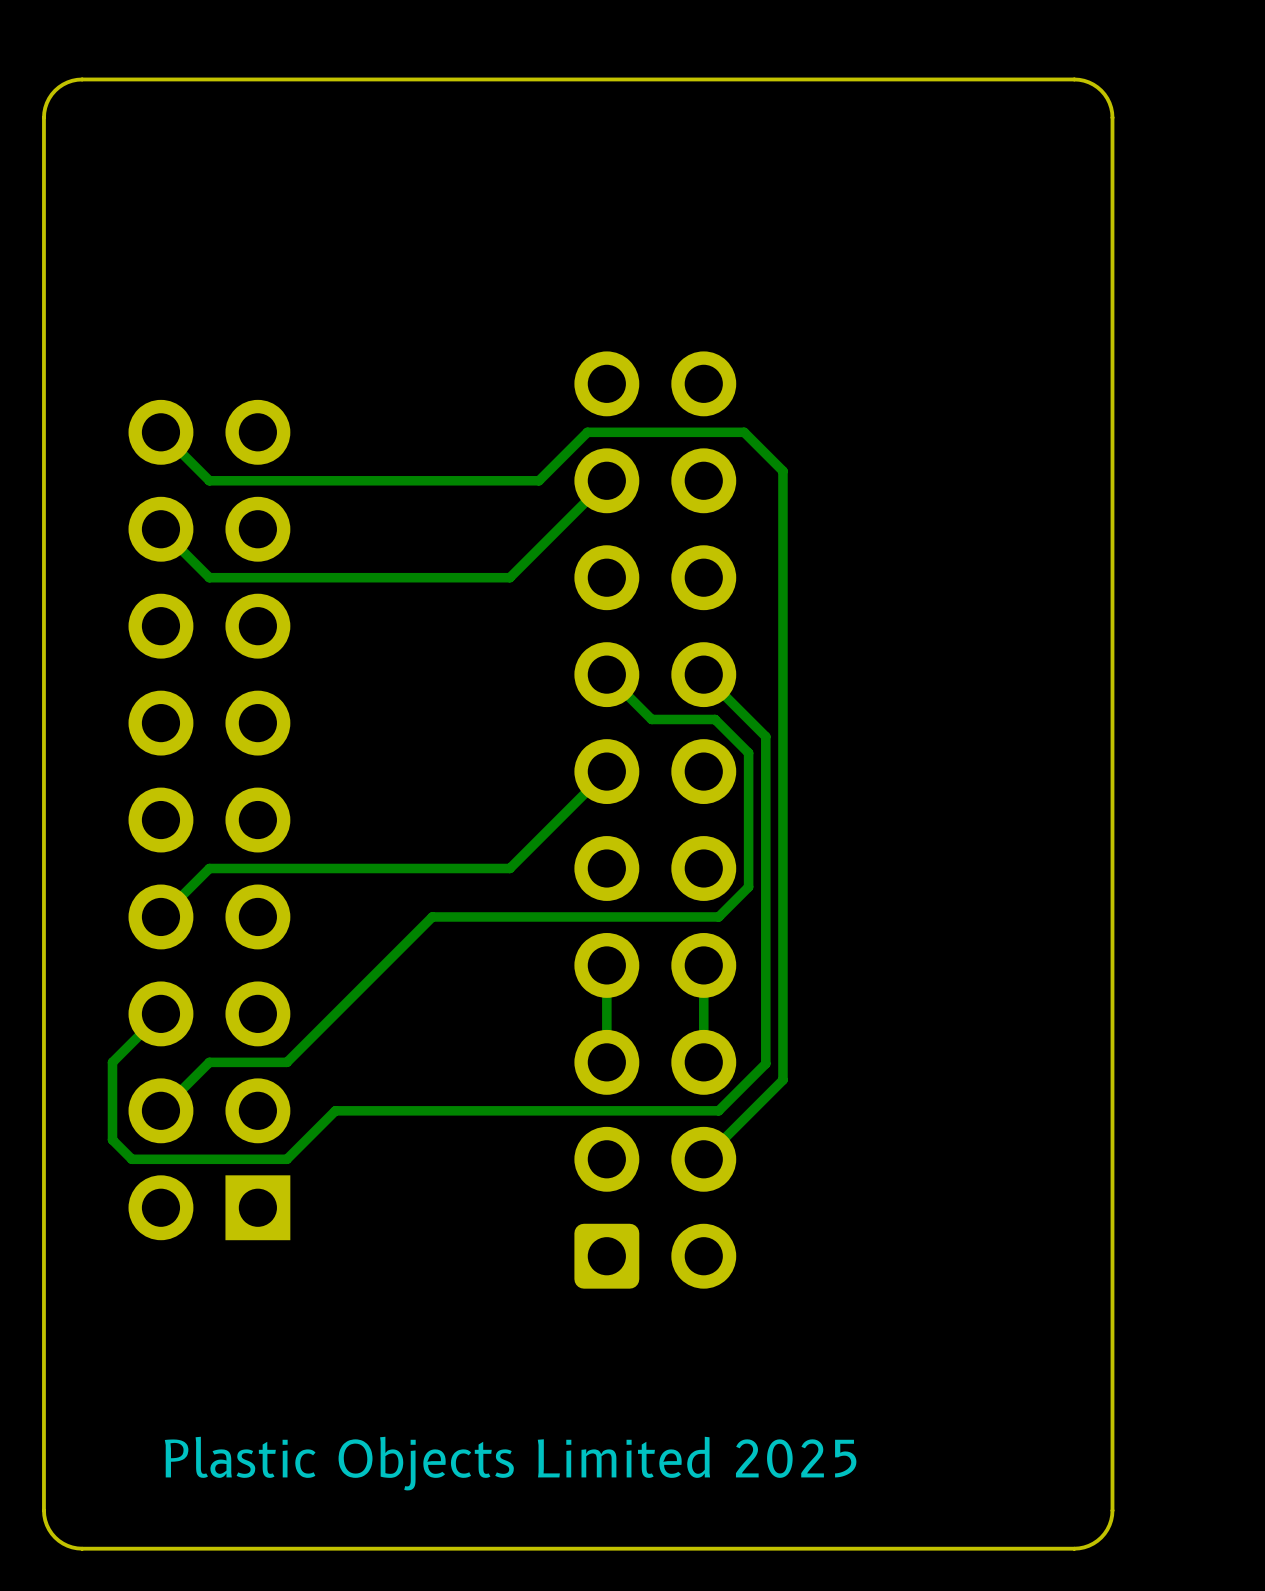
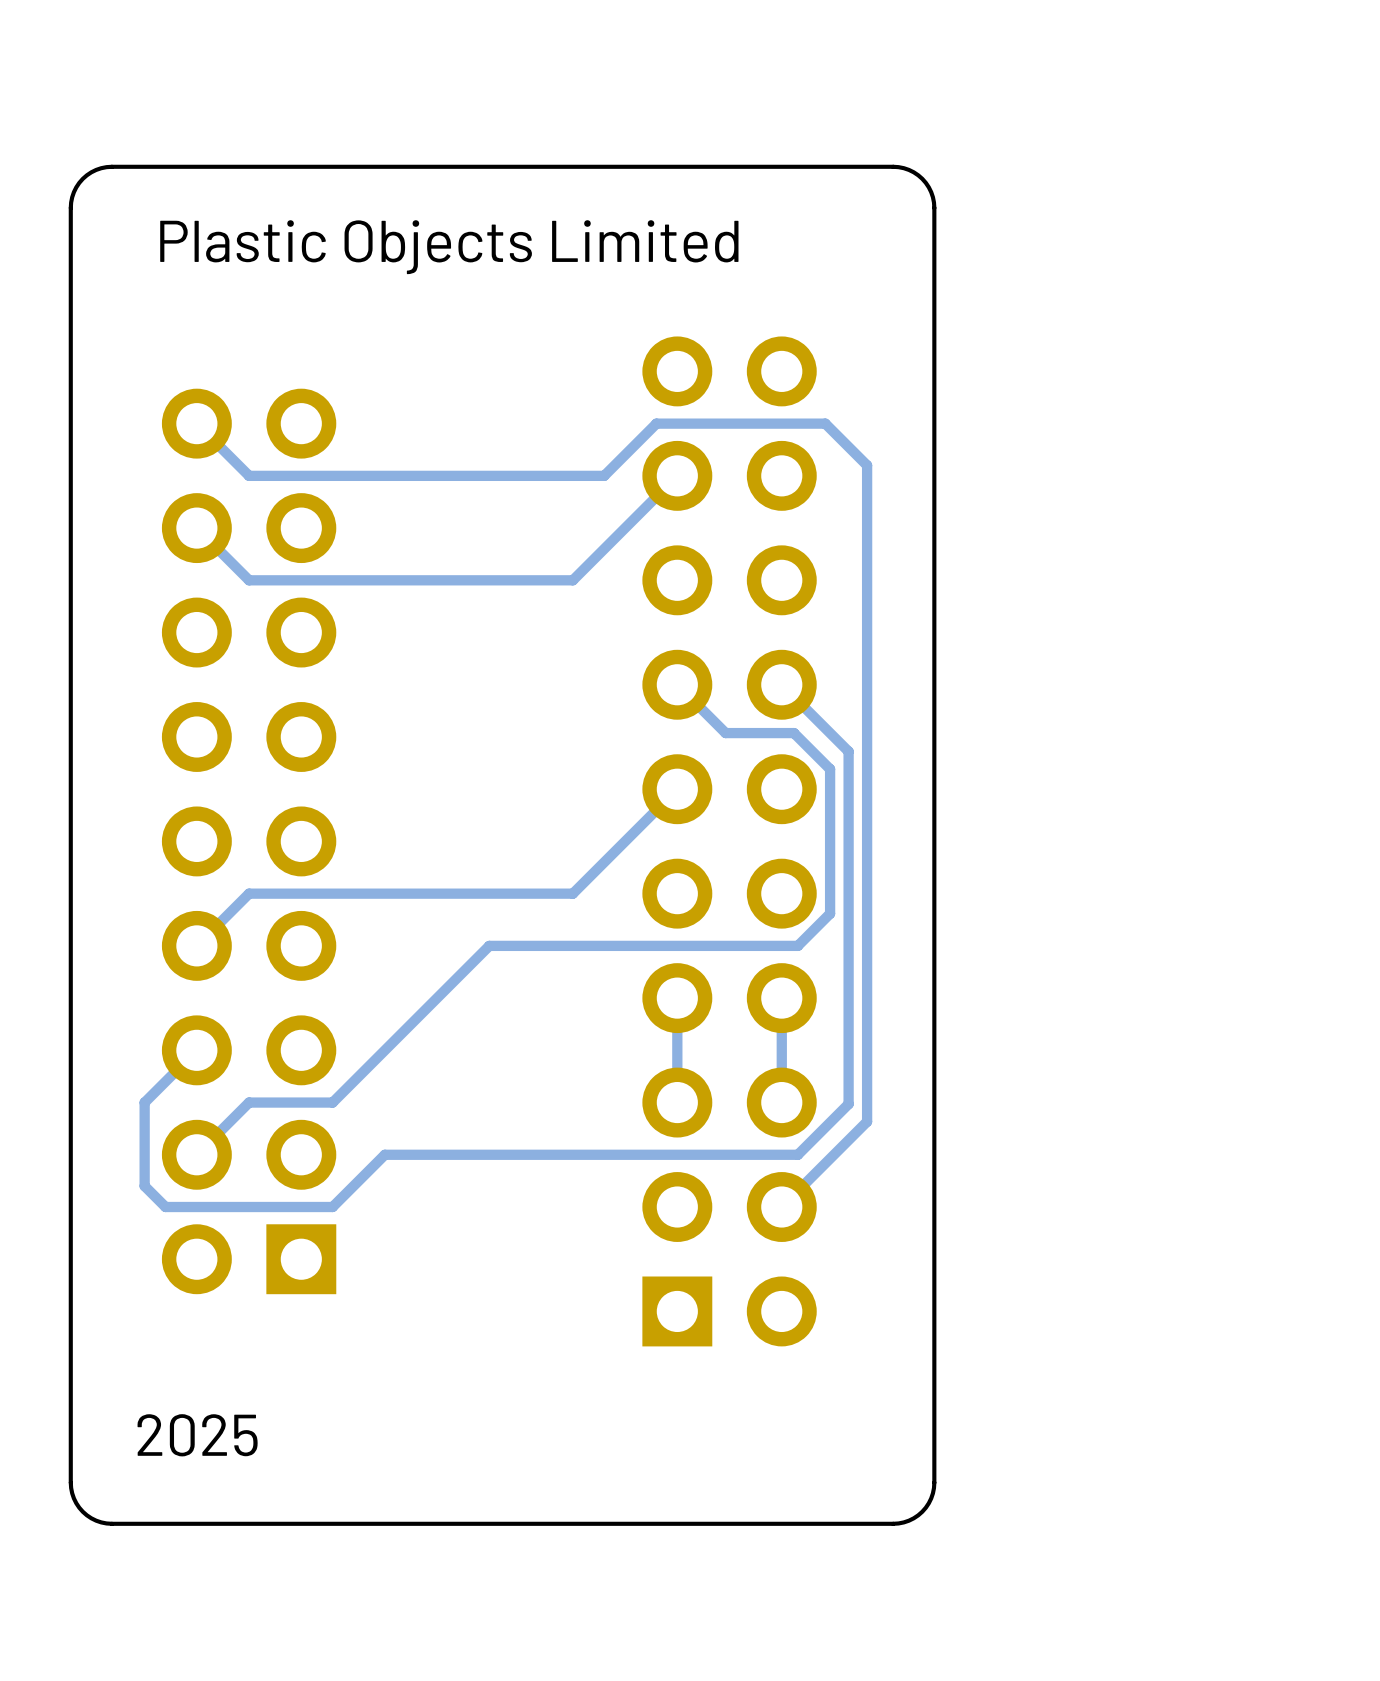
board edge: (43, 232) (45, 107) (49, 98) (58, 87) (77, 79) (1074, 79) (1088, 82) (1101, 90) (1107, 98) (1112, 112) (1112, 1510) (1111, 1520) (1104, 1533) (1093, 1543) (1074, 1548) (77, 1548) (58, 1540) (51, 1533) (45, 1520) (43, 1415) -> (70, 207) (73, 192) (82, 178) (96, 169) (111, 166) (893, 166) (908, 169) (922, 178) (931, 192) (934, 207) (934, 1482) (931, 1498) (925, 1507) (913, 1518) (893, 1523) (111, 1523) (96, 1520) (82, 1511) (73, 1498) (70, 1482)
text: none -> Plastic Objects Limited (449, 247)
part footprint: [574, 351, 737, 1289] -> [642, 336, 817, 1347]
text: none -> 2025 (197, 1435)
text: Plastic Objects Limited 2025 (510, 1463) -> none

